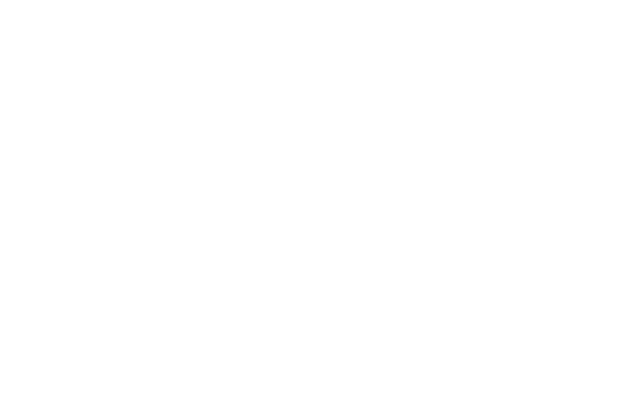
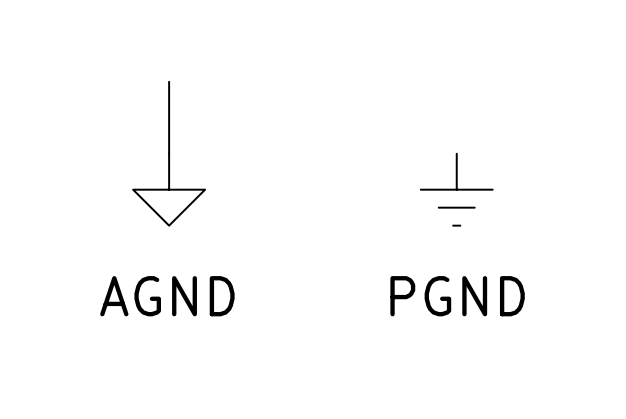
wire: none -> (169, 81) (169, 153)
power symbol: none -> AGND (169, 189)
power symbol: none -> PGND (456, 189)

